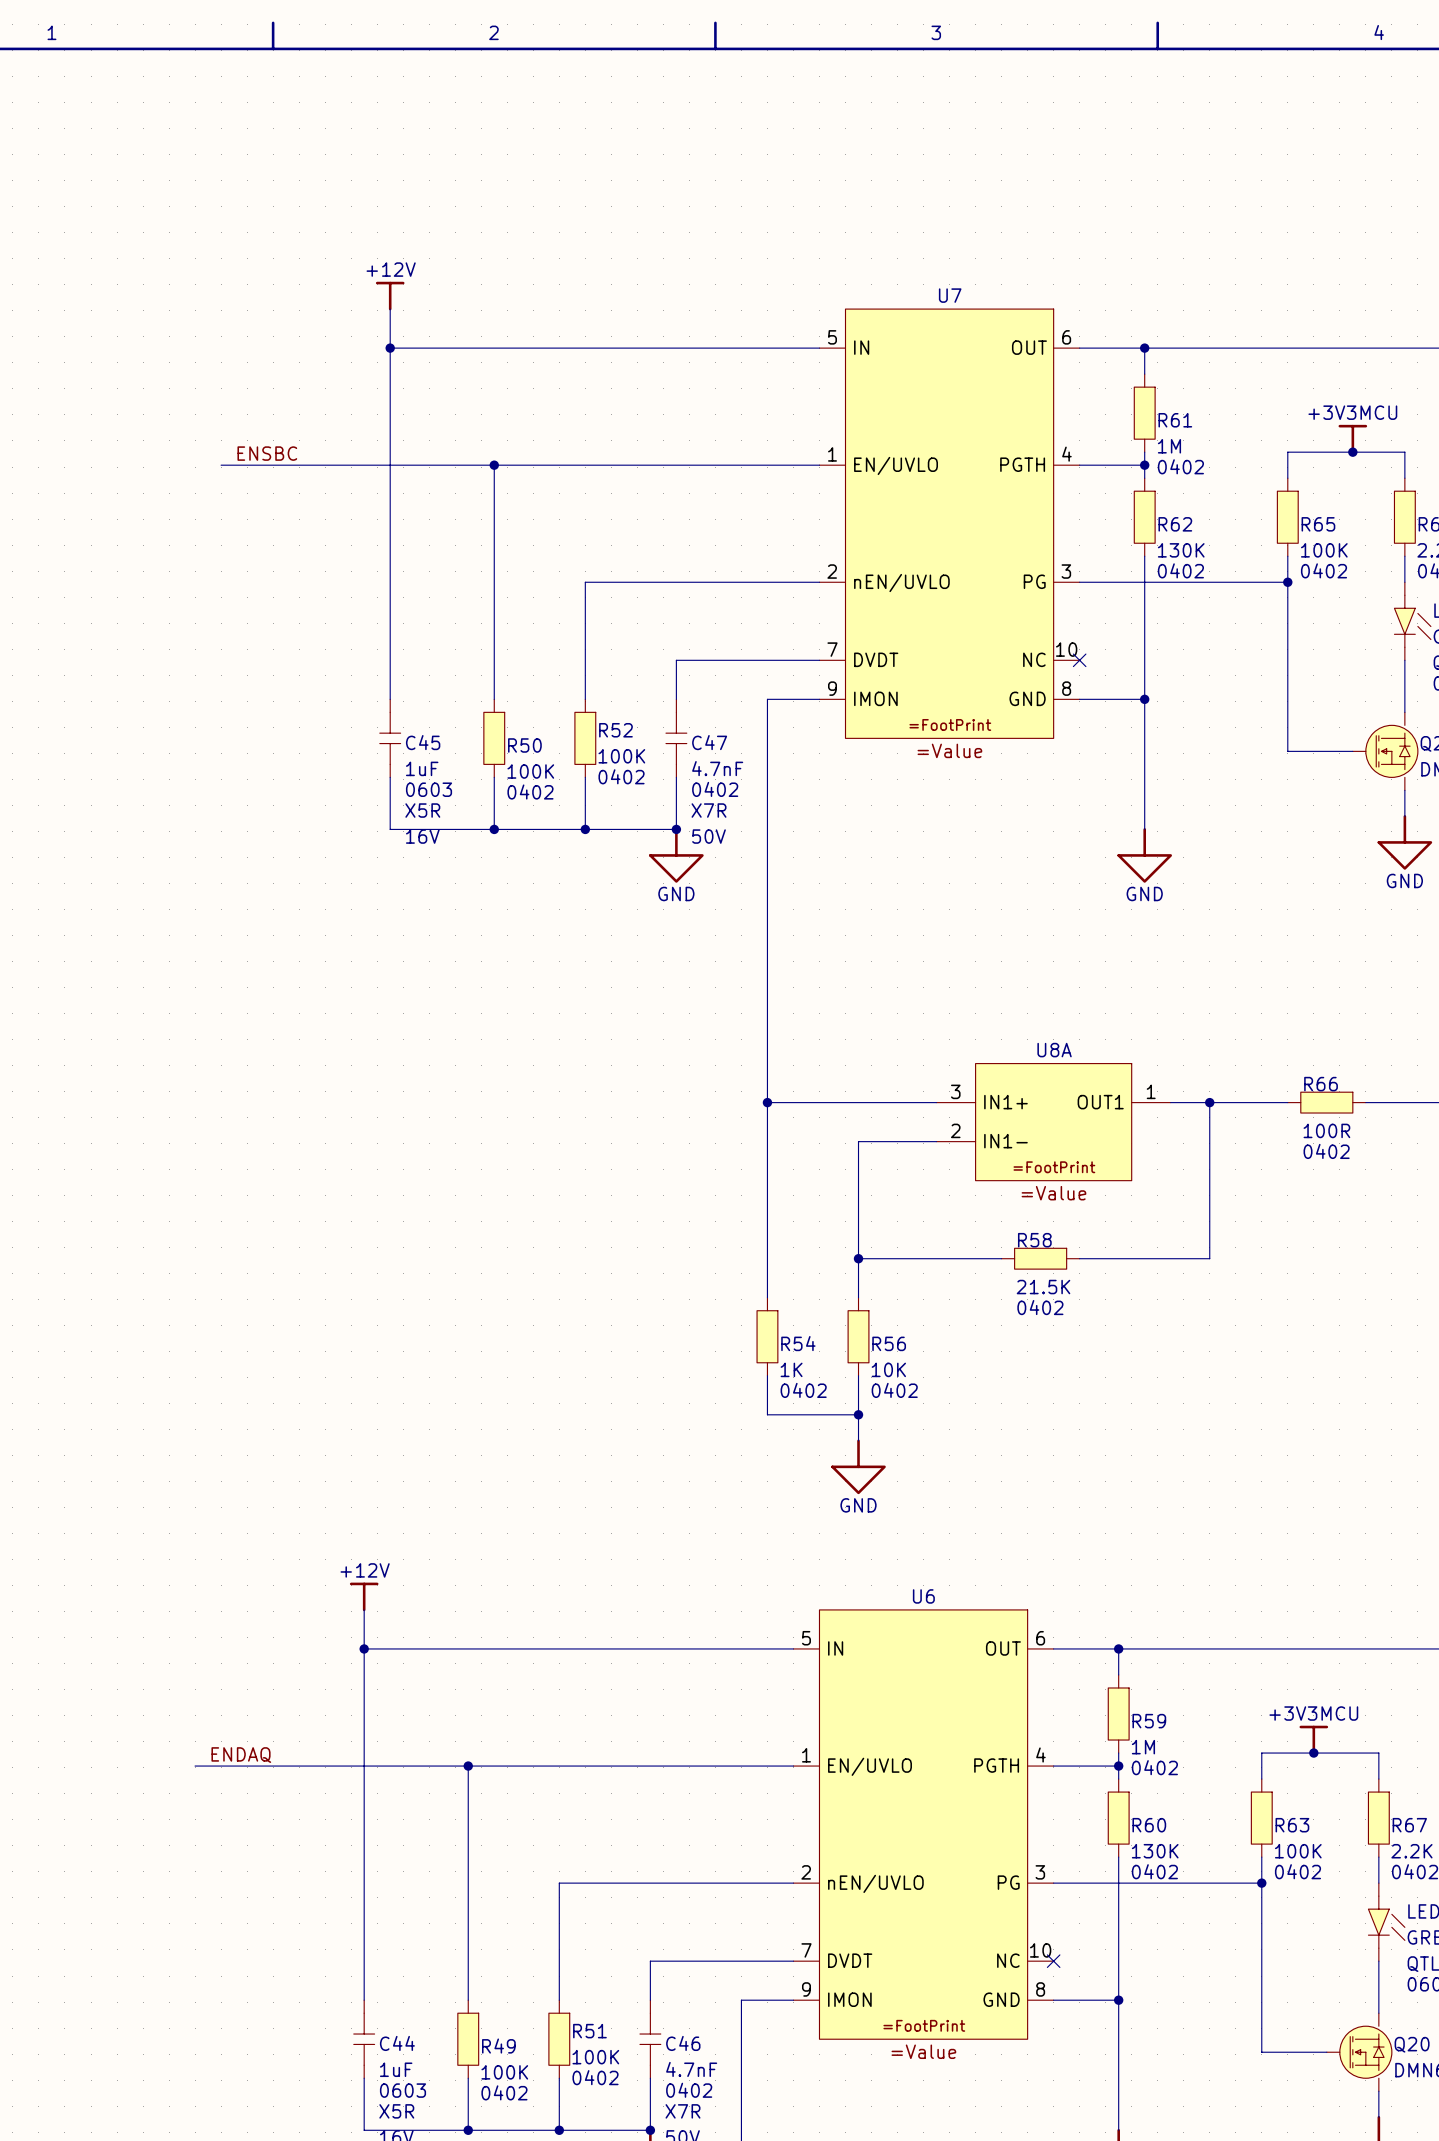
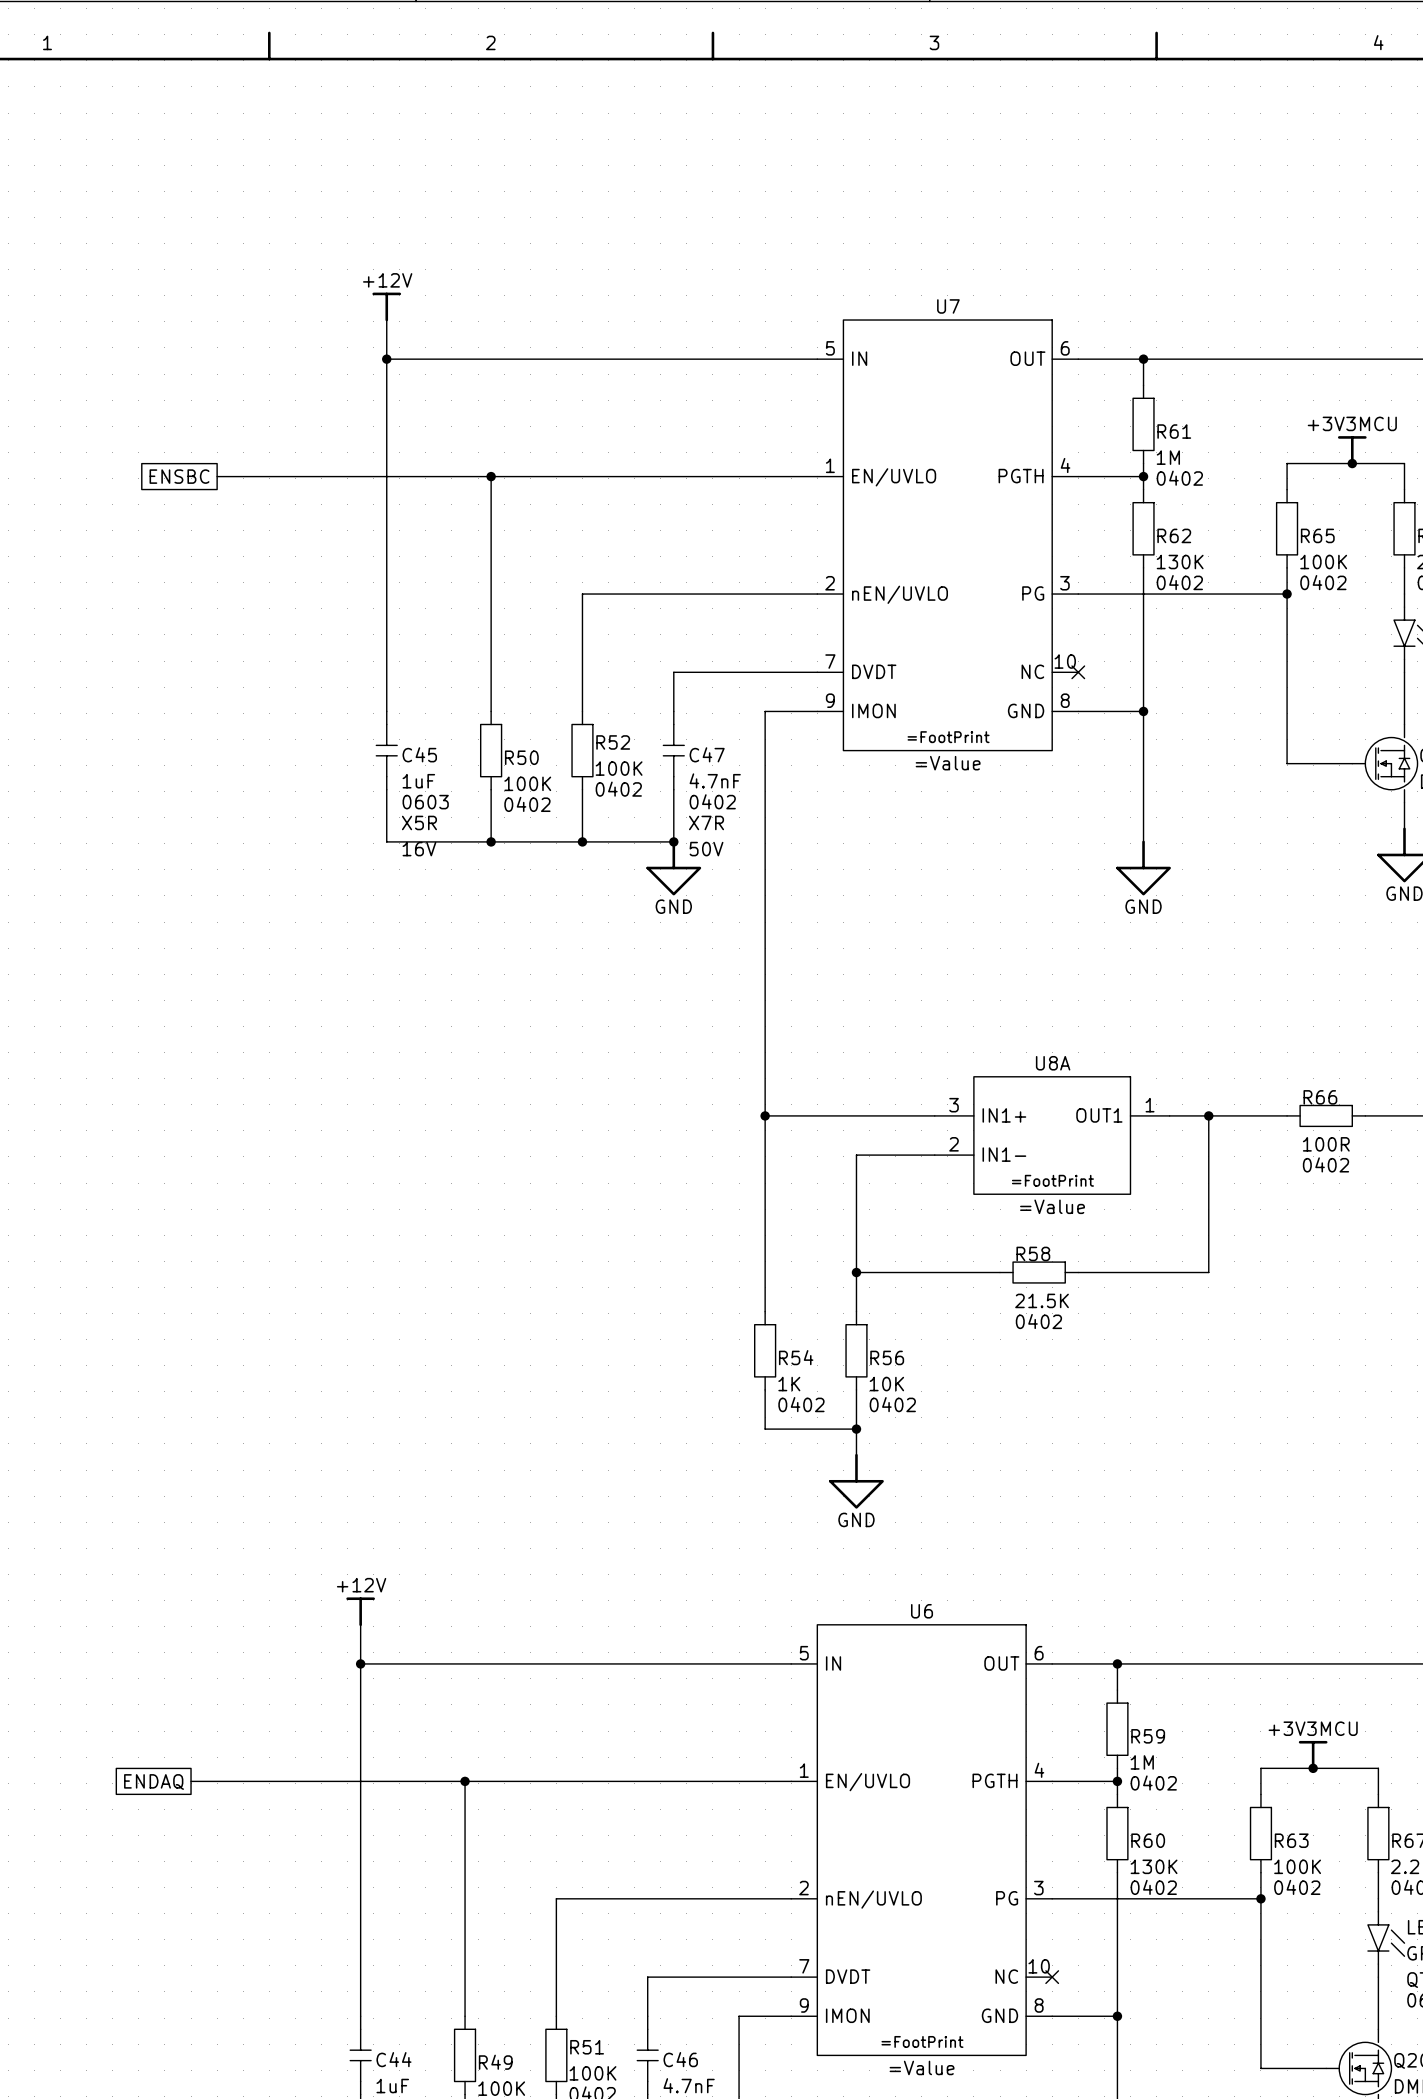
label: ENSBC (267, 453) -> none
global label: none -> ENSBC (179, 476)
label: ENDAQ (241, 1755) -> none
global label: none -> ENDAQ (154, 1782)

